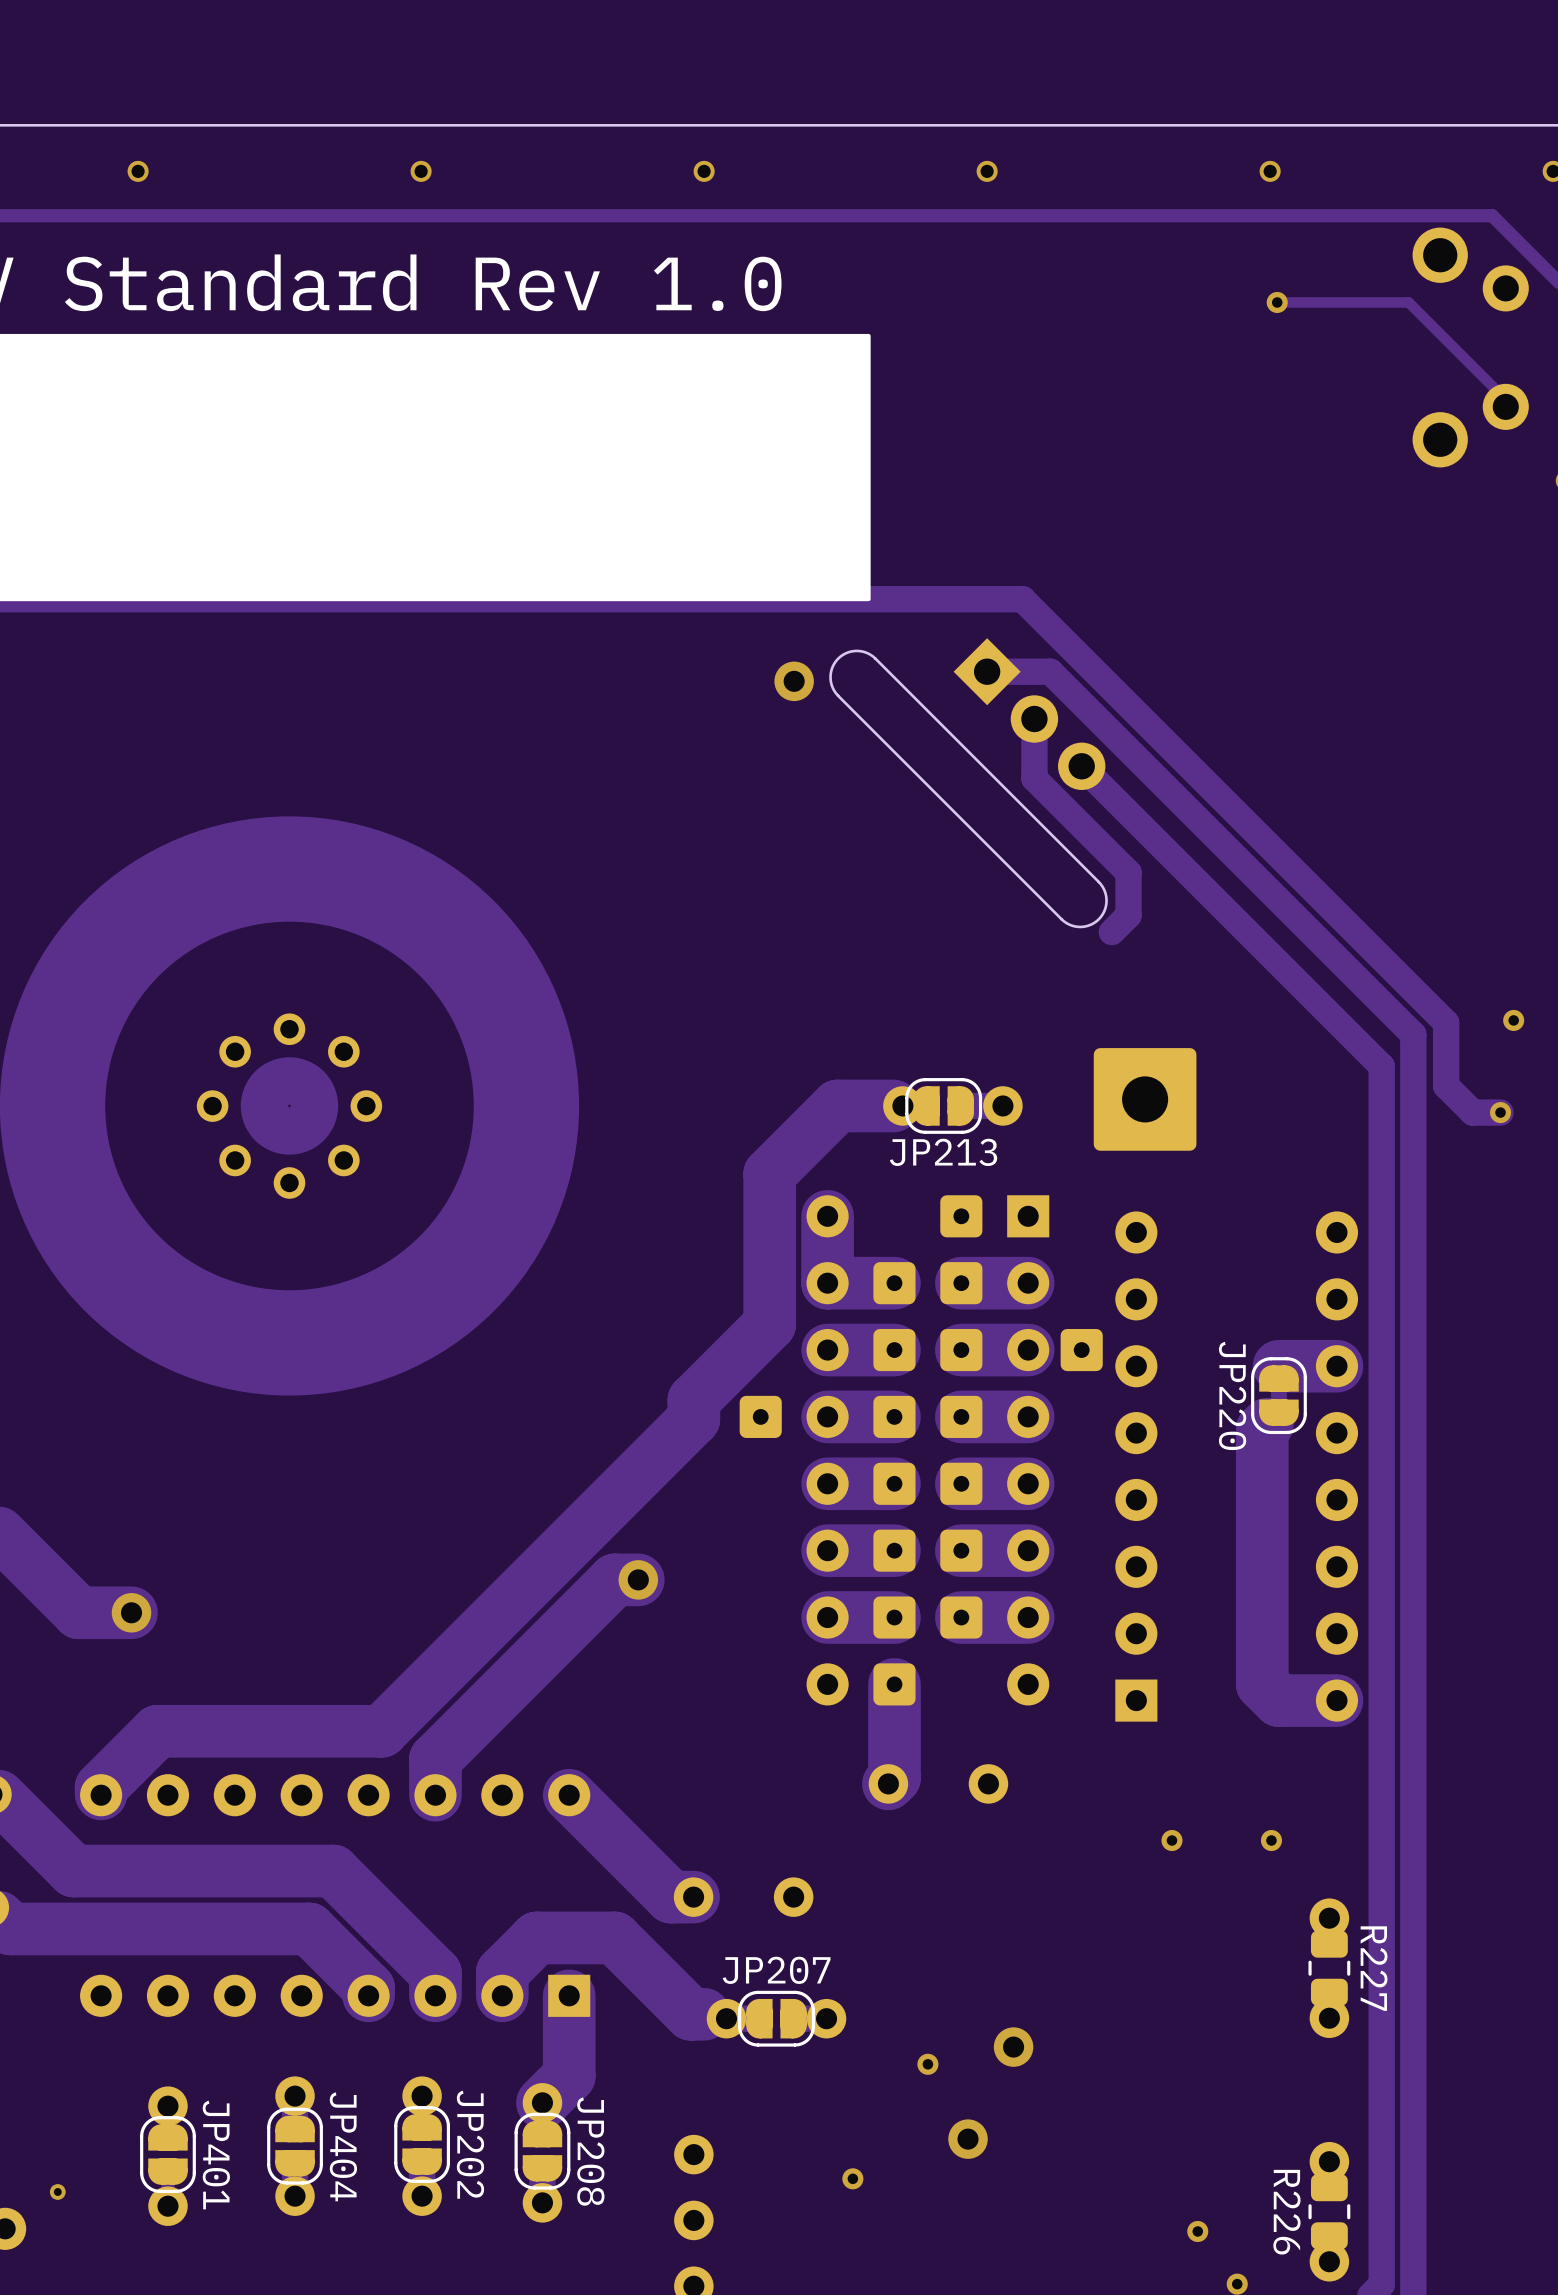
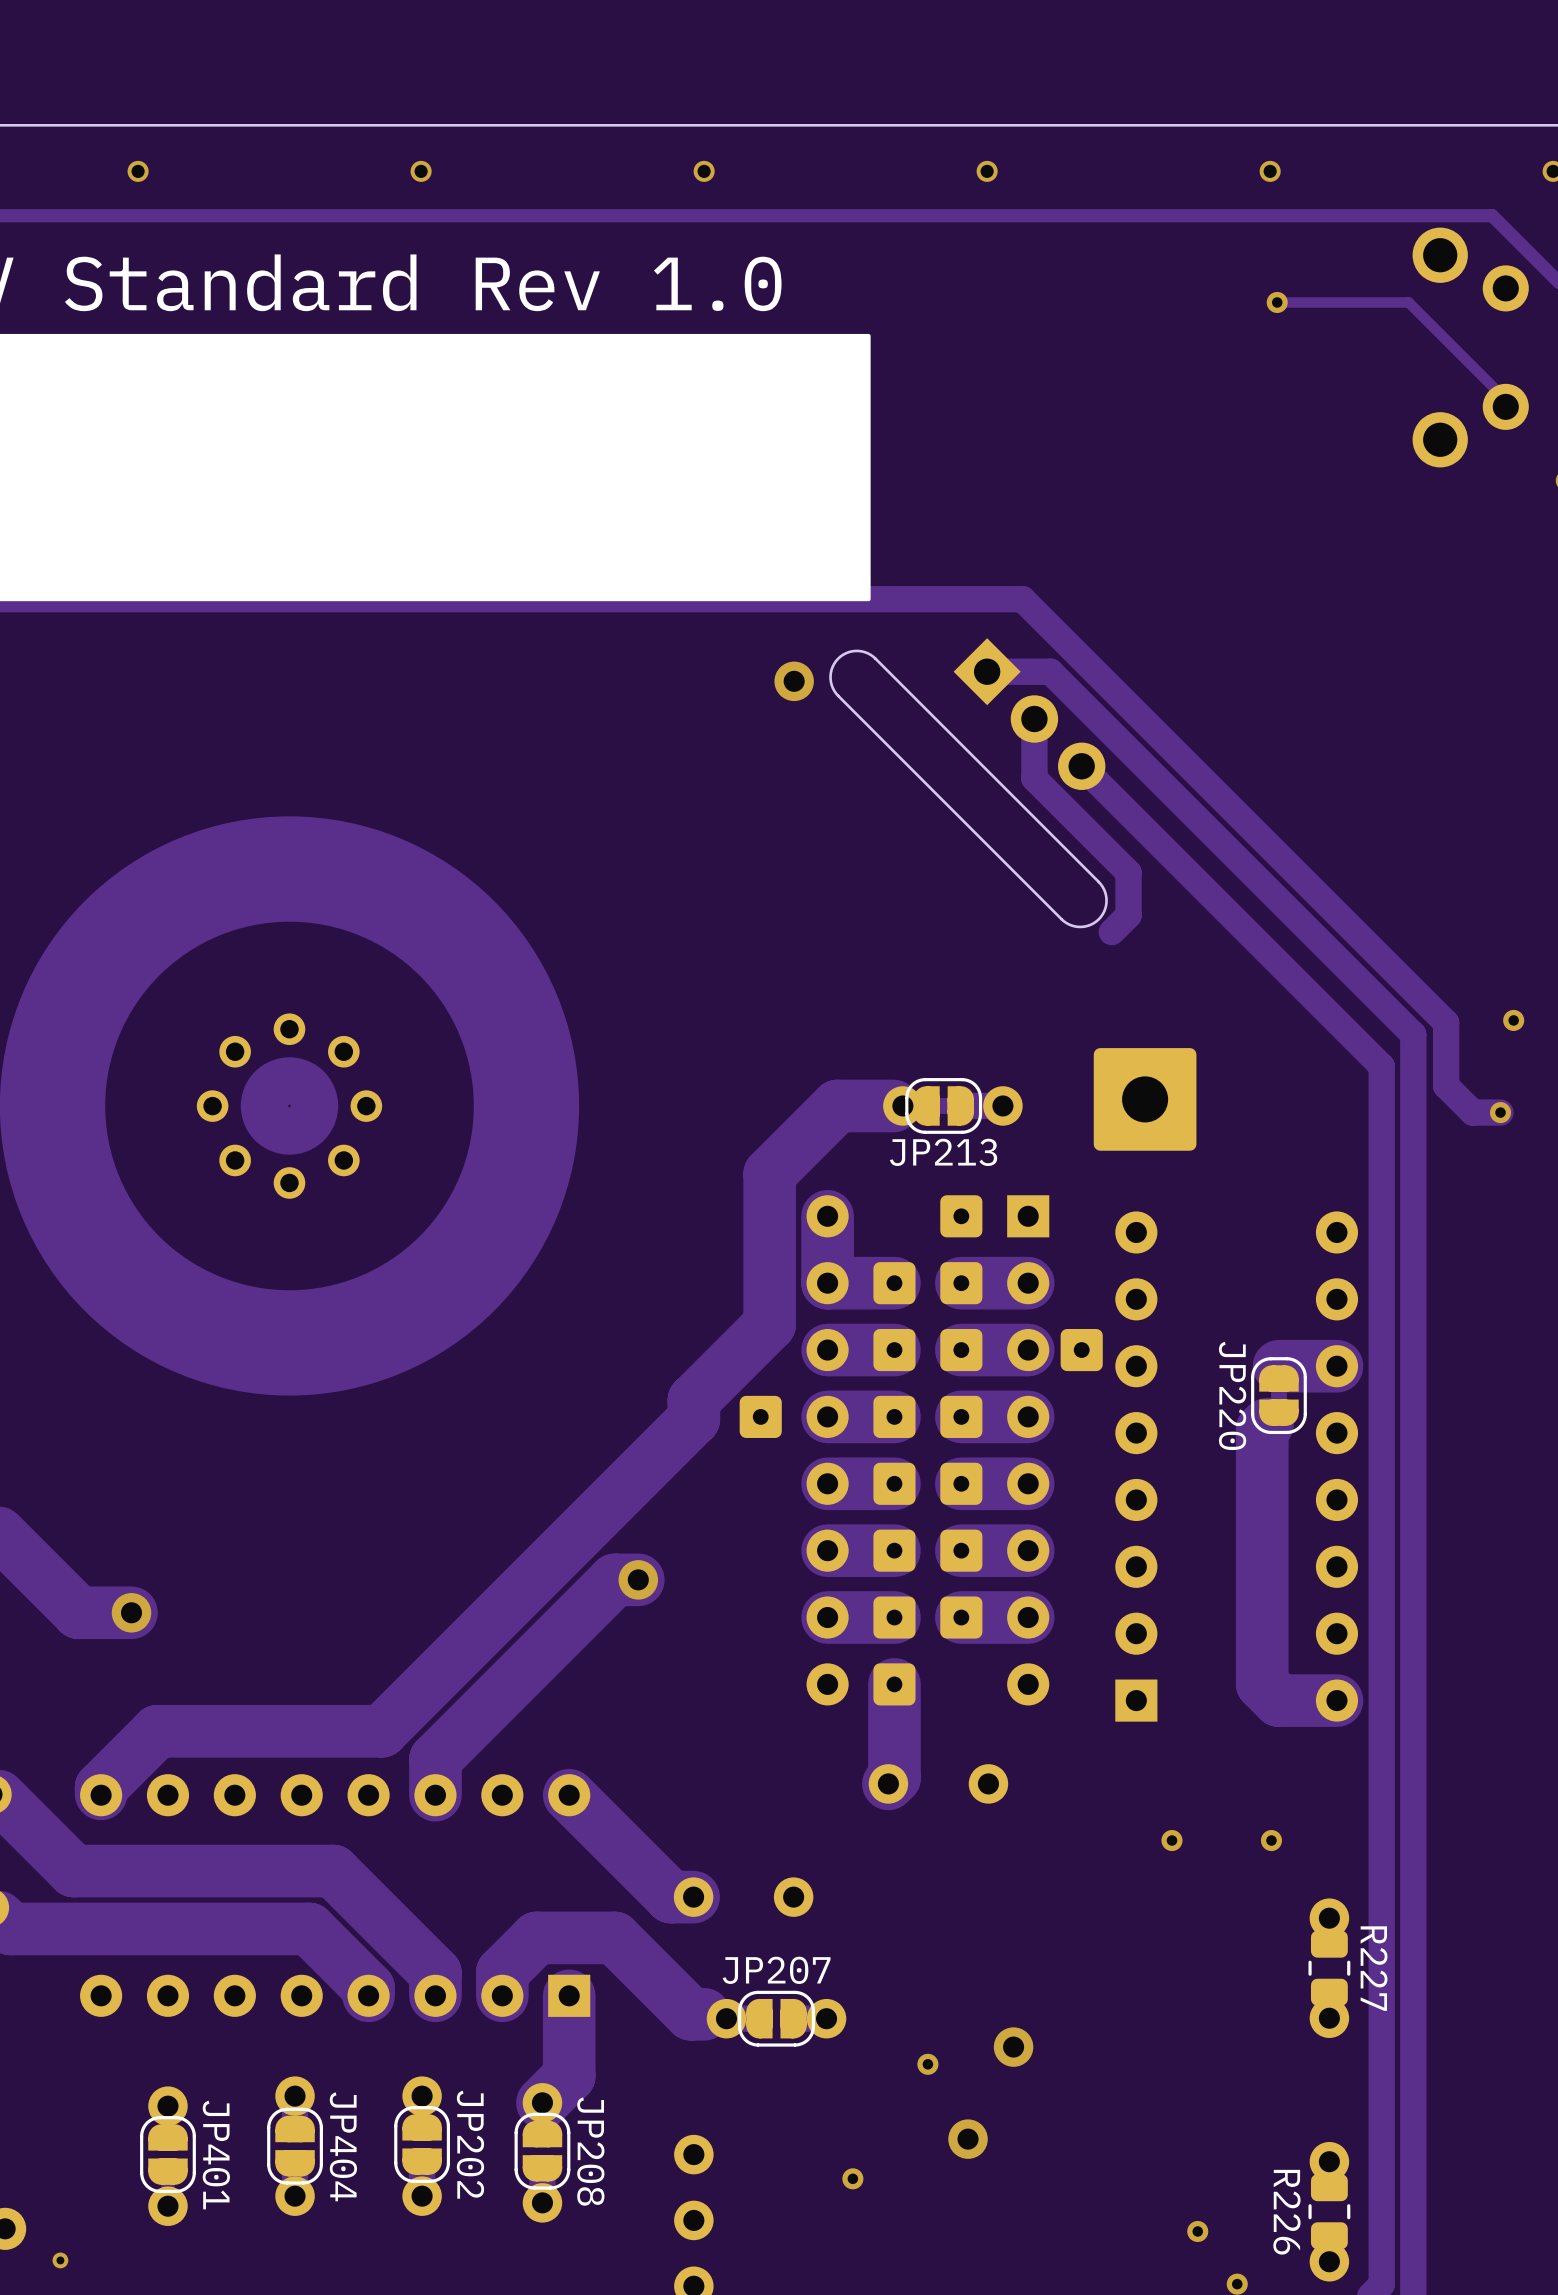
JP213 footprint: [905, 1078, 983, 1134] -> [905, 1078, 983, 1134]
via position: (57, 2191) -> (60, 2260)

